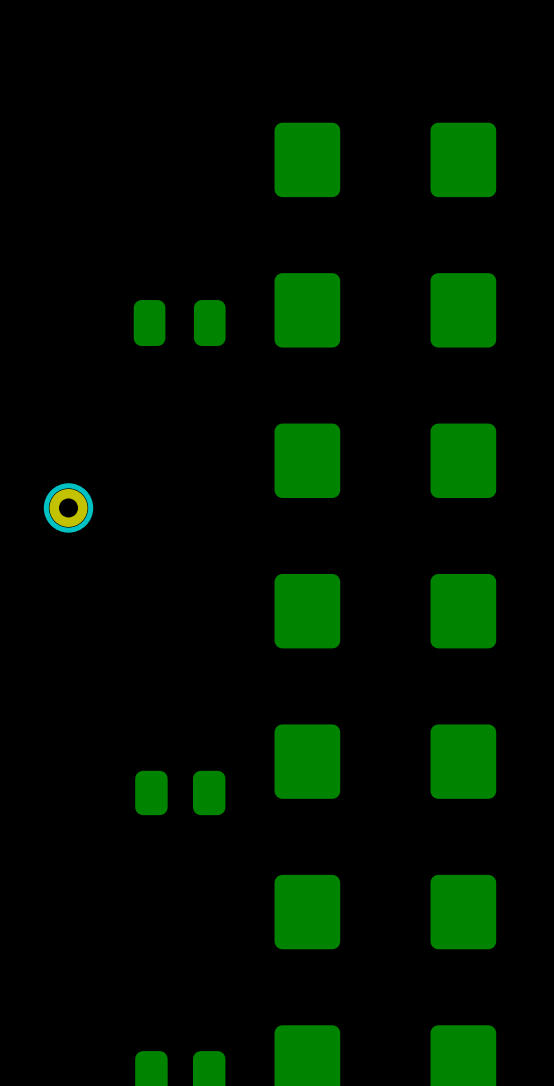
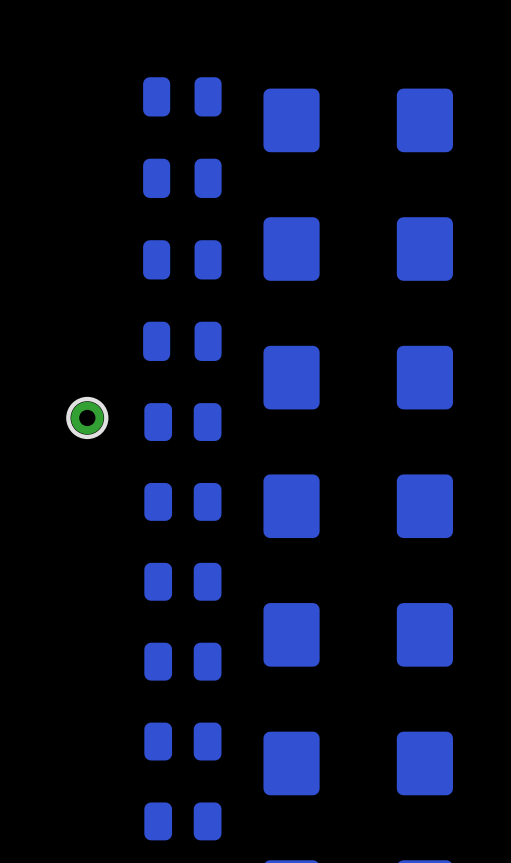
part: none -> (182, 96)
part: none -> (182, 178)
part: none -> (182, 341)
part: none -> (182, 422)
part: none -> (182, 501)
part: none -> (182, 581)
part: none -> (182, 741)
part: none -> (182, 821)

